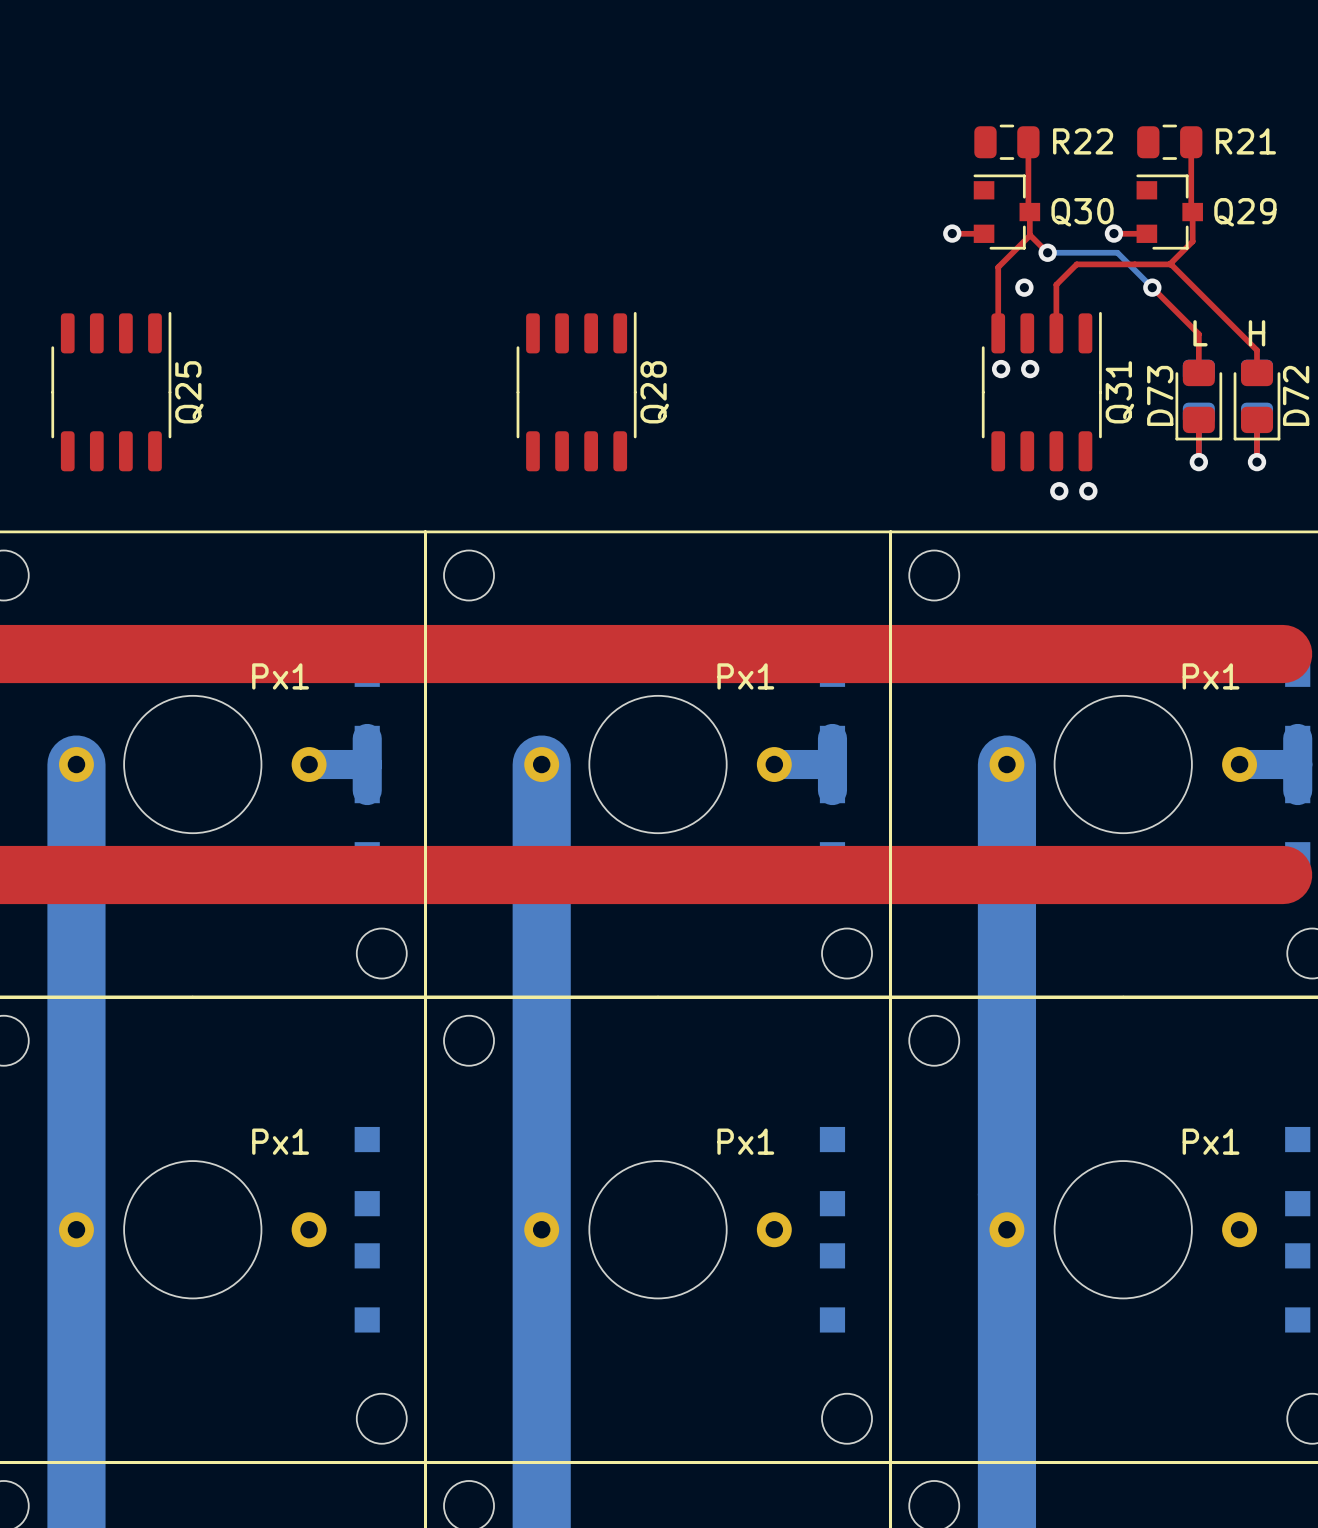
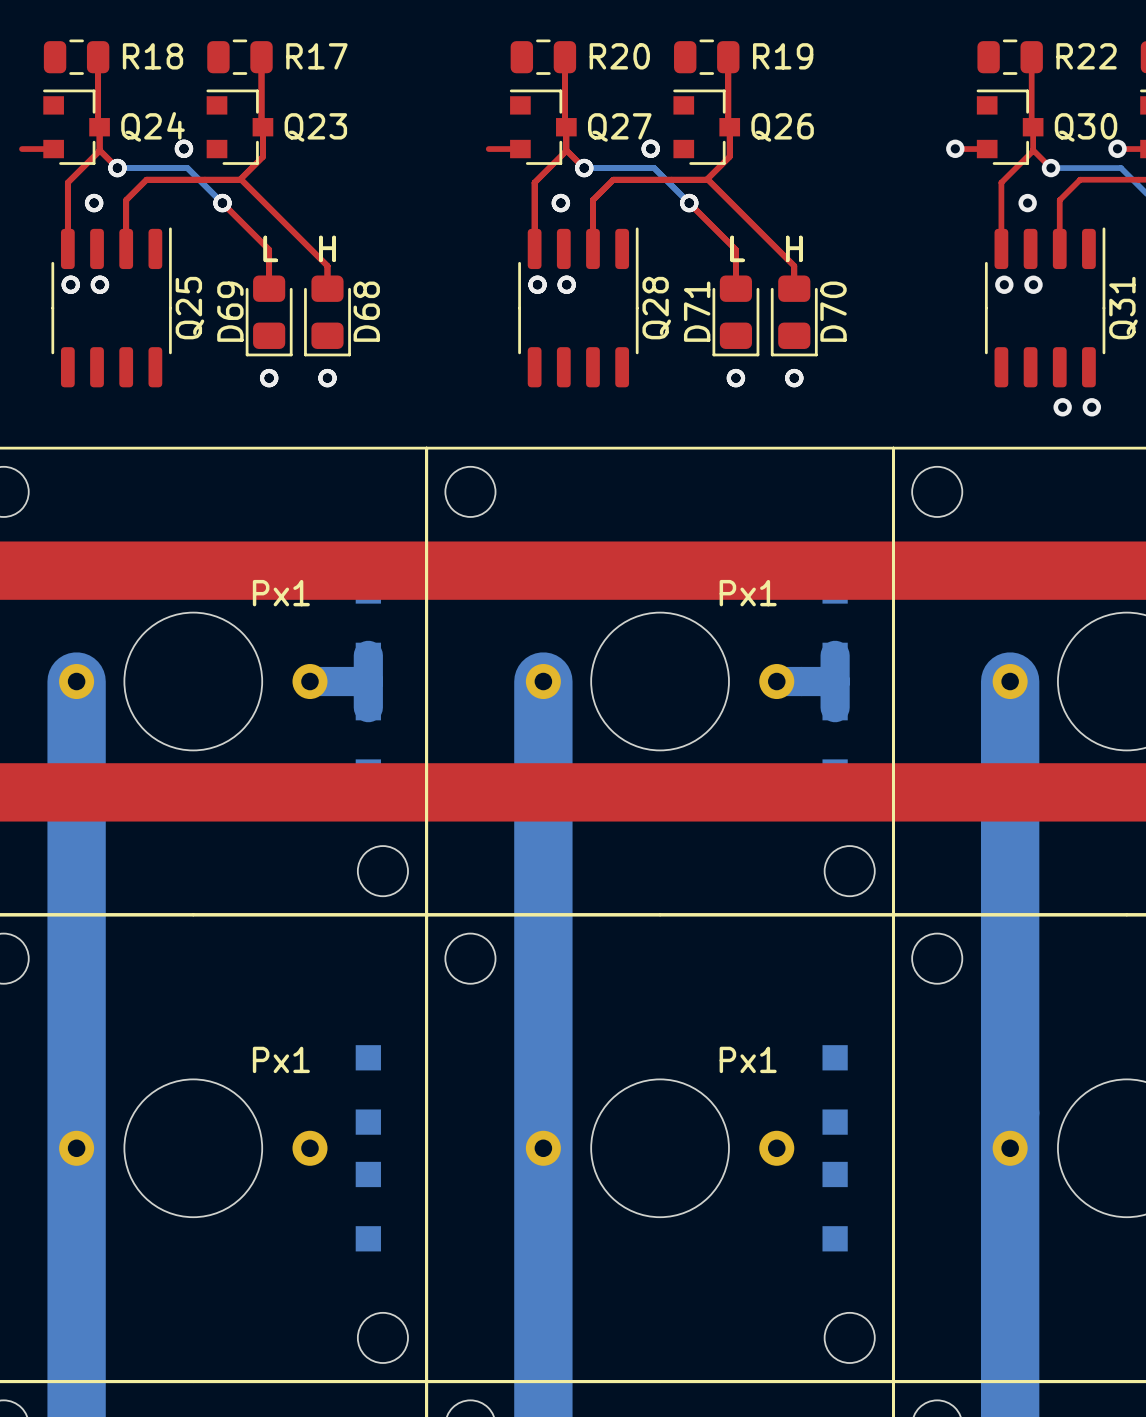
R18: none -> (76, 57)
top track: none -> (98, 57) (99, 150) (67, 182) (67, 248)
R17: none -> (239, 57)
top track: none -> (261, 57) (262, 156) (239, 179)
R20: none -> (543, 57)
top track: none -> (564, 57) (566, 150) (534, 182) (534, 248)
R19: none -> (706, 57)
top track: none -> (728, 57) (729, 156) (706, 179)
Q24: none -> (76, 127)
Q23: none -> (239, 127)
Q27: none -> (543, 127)
Q26: none -> (706, 127)
top track: none -> (21, 149) (53, 149)
via: none -> (183, 148)
top track: none -> (488, 149) (520, 149)
via: none -> (650, 148)
top track: none -> (99, 150) (117, 168)
top track: none -> (566, 150) (584, 168)
bottom track: none -> (117, 168) (187, 168) (222, 203)
via: none -> (117, 168)
bottom track: none -> (584, 168) (654, 168) (689, 203)
via: none -> (584, 168)
via: none -> (94, 203)
top track: none -> (222, 203) (269, 249) (269, 288)
via: none -> (222, 203)
via: none -> (560, 203)
top track: none -> (689, 203) (735, 249) (735, 288)
via: none -> (689, 203)
top track: none -> (126, 248) (126, 200) (146, 179) (241, 179) (327, 265) (327, 288)
text: none -> L (270, 248)
text: none -> H (327, 248)
top track: none -> (592, 248) (592, 200) (613, 179) (708, 179) (794, 265) (794, 288)
text: none -> L (737, 248)
text: none -> H (794, 248)
via: none -> (70, 284)
via: none -> (99, 284)
via: none -> (537, 284)
via: none -> (566, 284)
D69: none -> (269, 315)
D68: none -> (327, 315)
D71: none -> (735, 315)
D70: none -> (794, 315)
via: none -> (269, 378)
via: none -> (327, 378)
via: none -> (735, 378)
via: none -> (794, 378)

